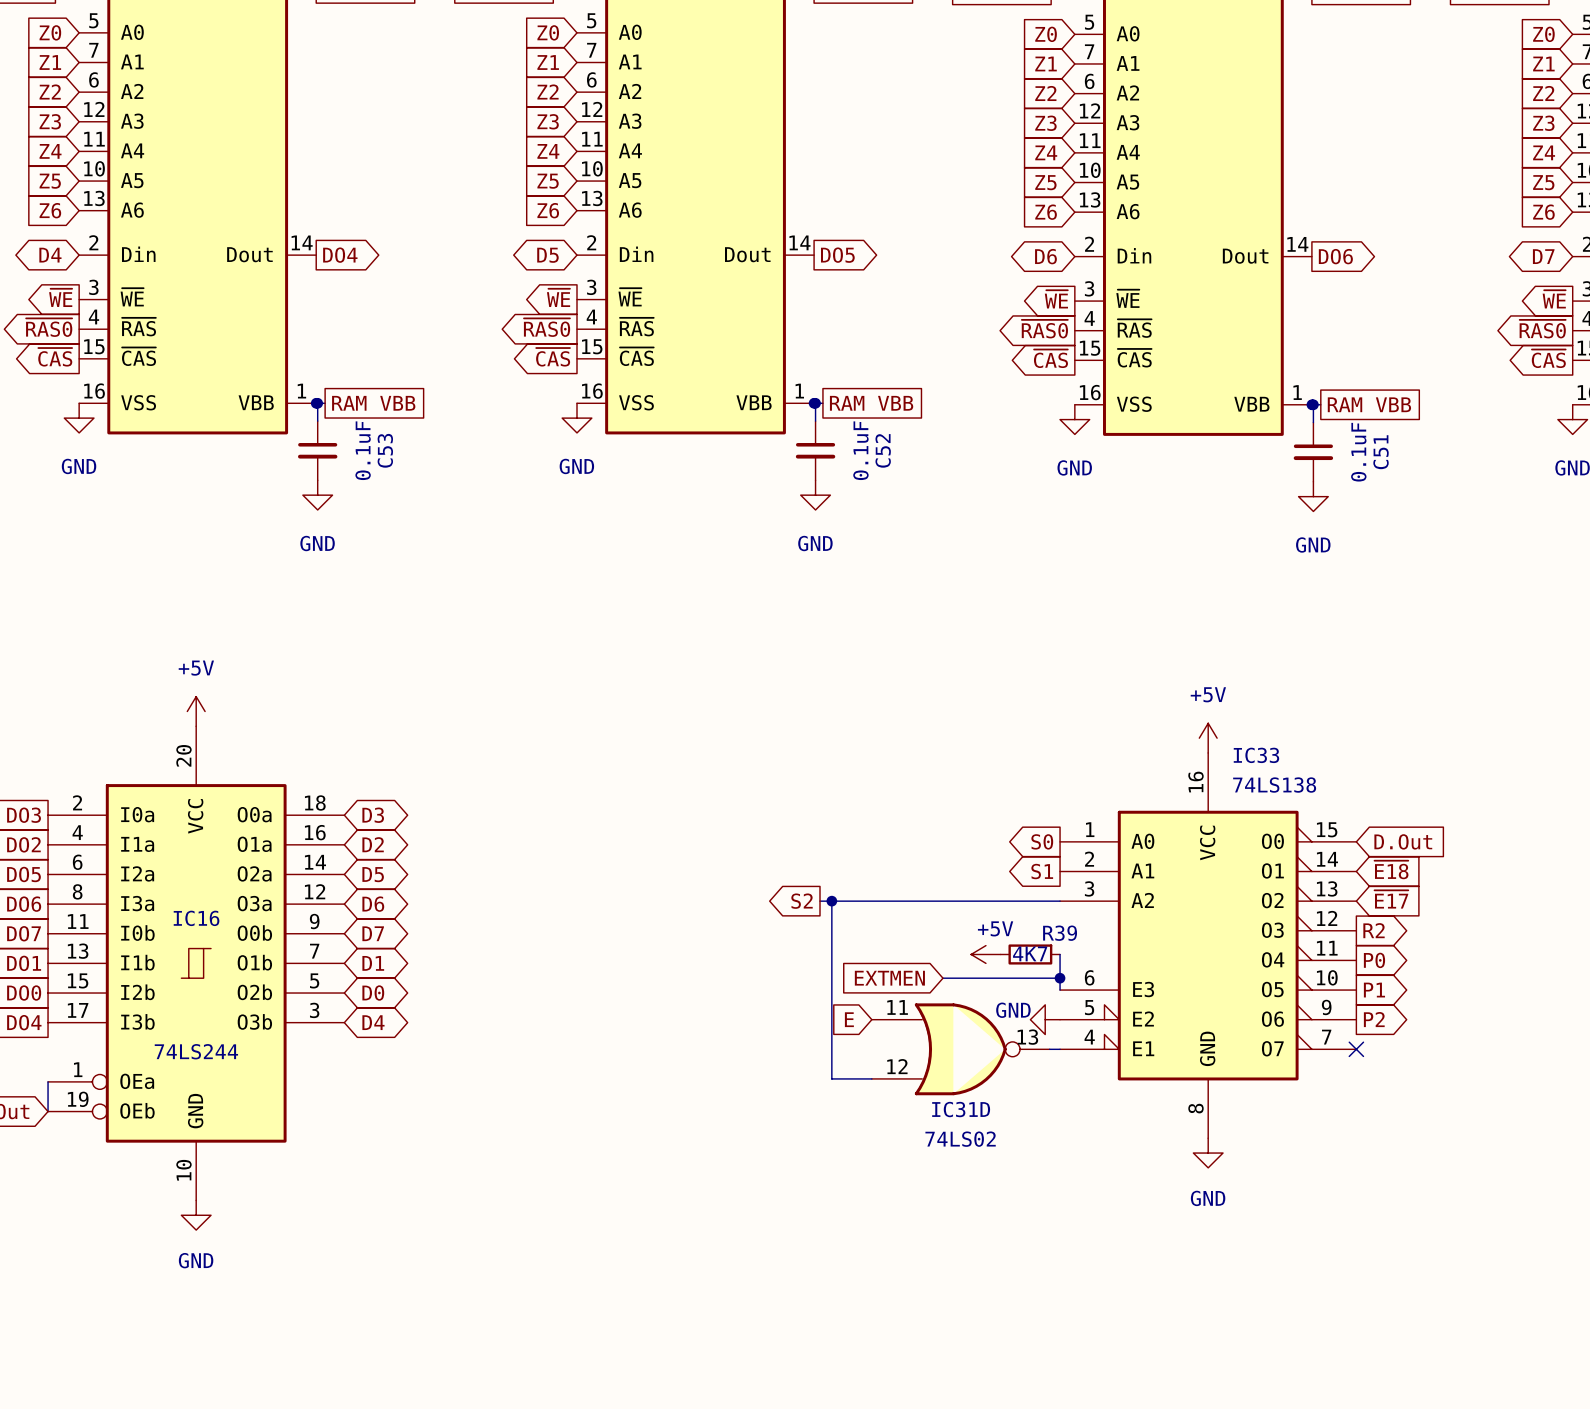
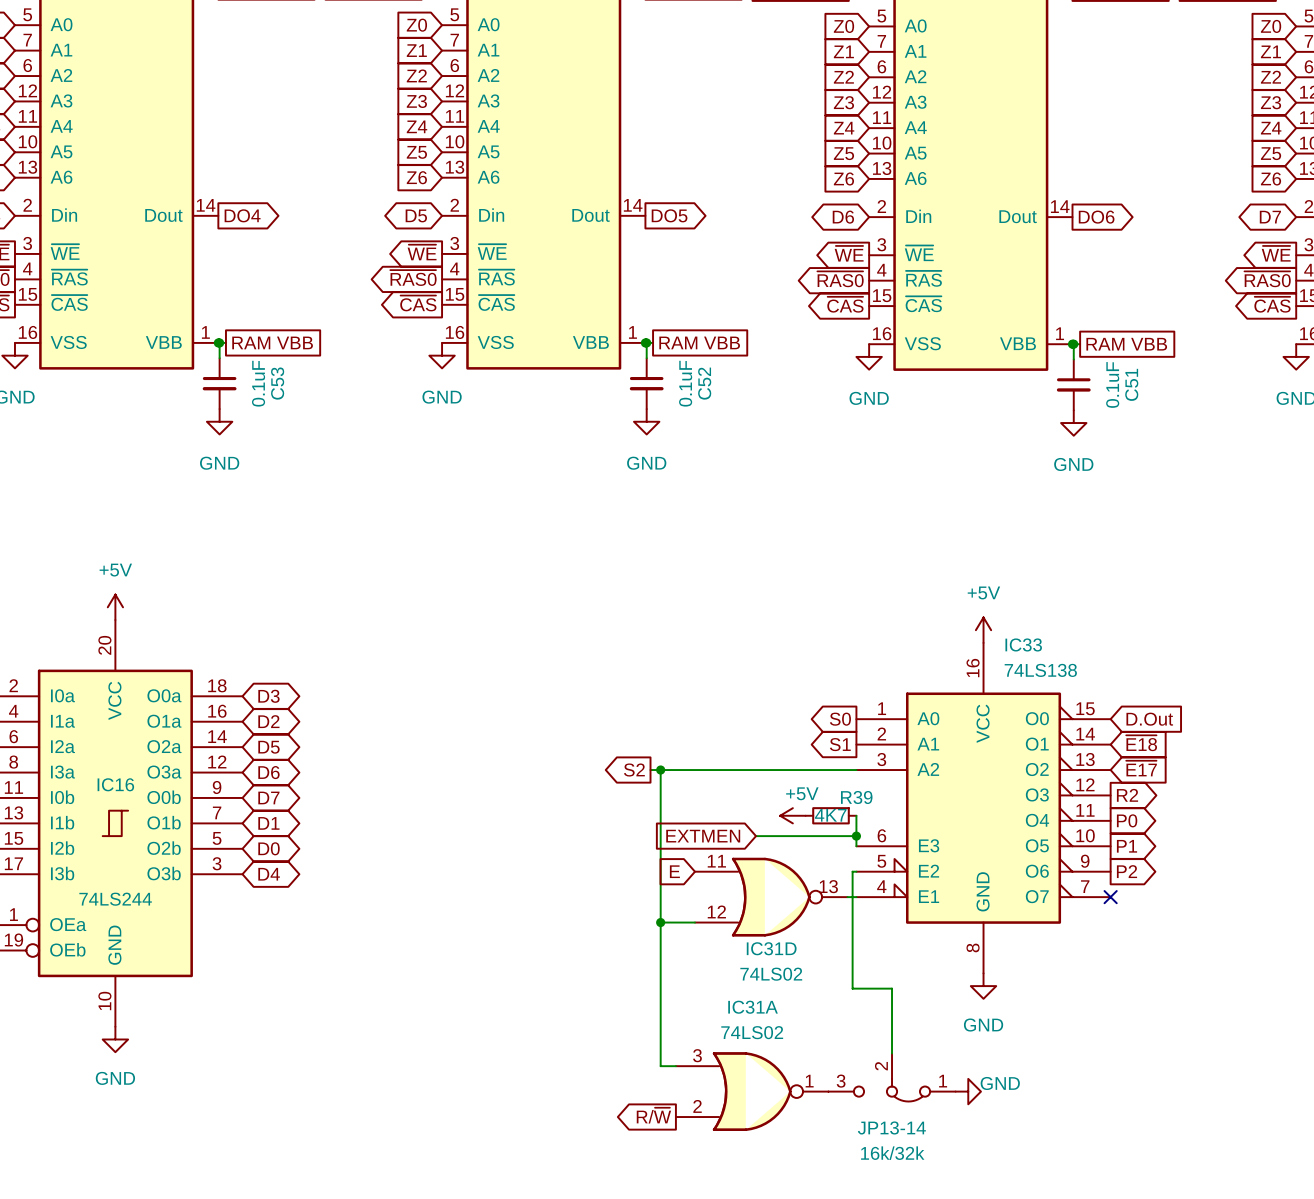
power symbol: GND (1045, 1019) -> none
wire: none -> (856, 871) (852, 871) (852, 988) (892, 988) (892, 1053)
wire: none -> (660, 922) (660, 1066) (675, 1066)
junction: none -> (660, 922)
JP13-14: none -> 16k/32k (892, 1077)
IC31A: none -> 74LS02 (752, 1091)
power symbol: none -> GND (968, 1091)
global label: none -> R/~{W} (653, 1115)

